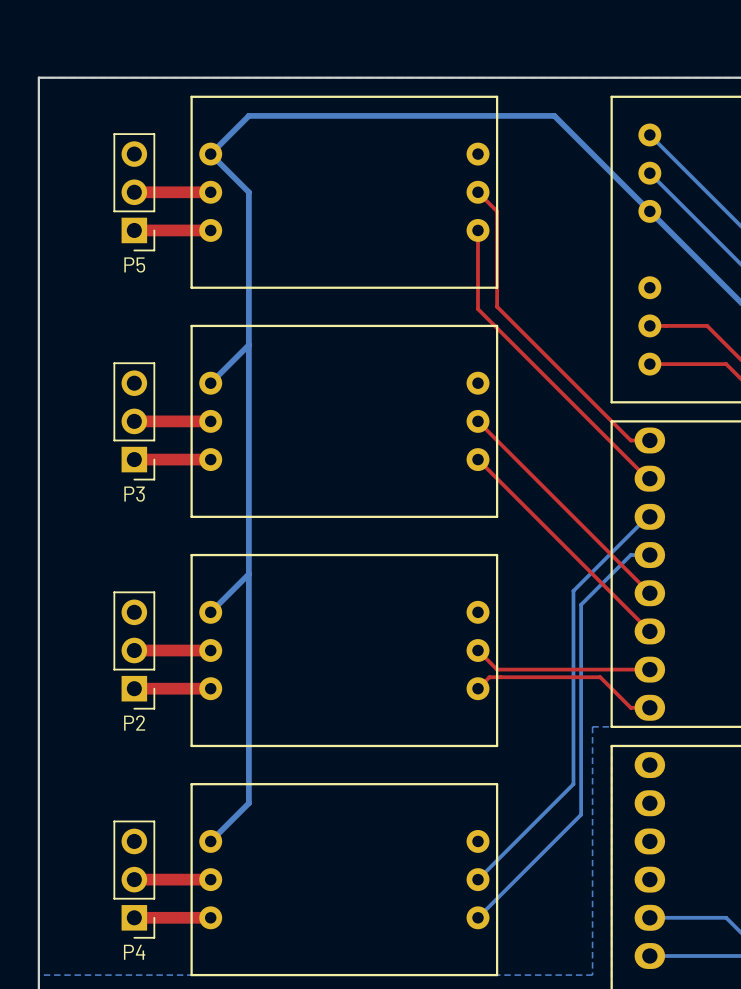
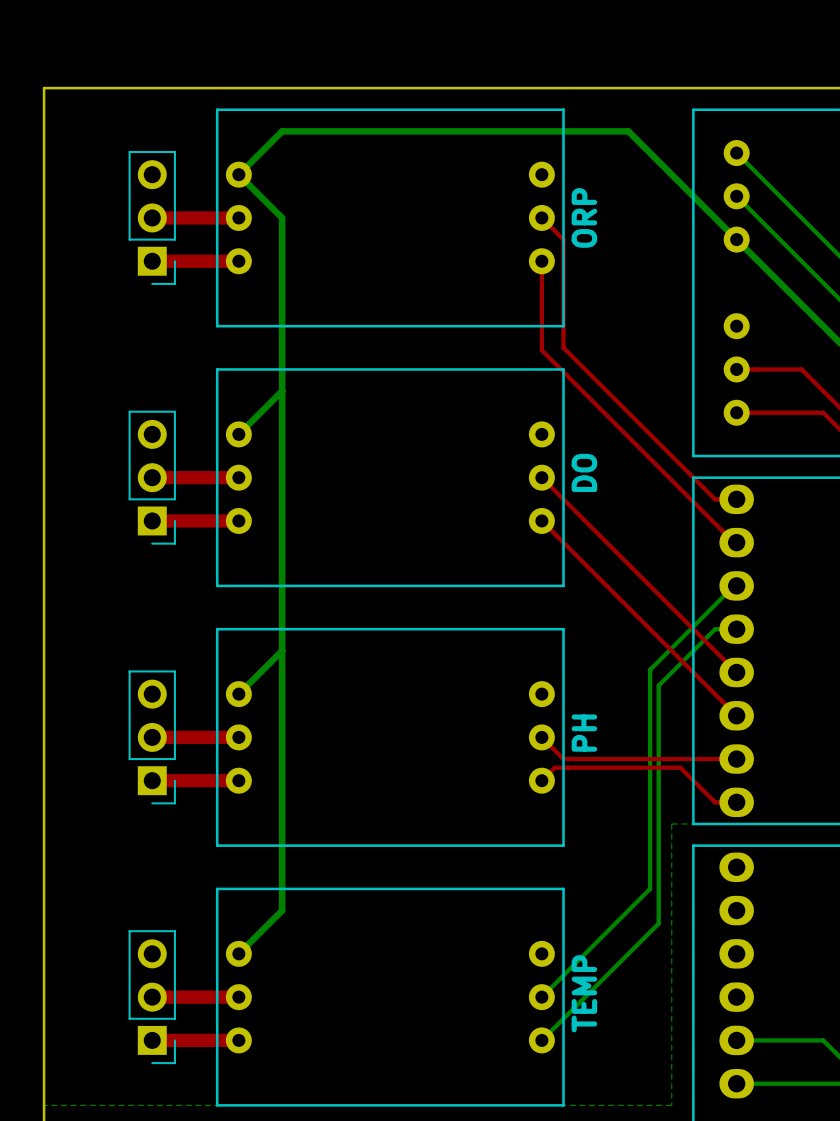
text: none -> ORP (584, 217)
P5 name: P5 (134, 264) -> none
text: none -> DO (584, 472)
P3 name: P3 (134, 494) -> none
text: none -> PH (584, 733)
P2 name: P2 (134, 723) -> none
text: none -> TEMP (584, 993)
P4 name: P4 (134, 952) -> none

